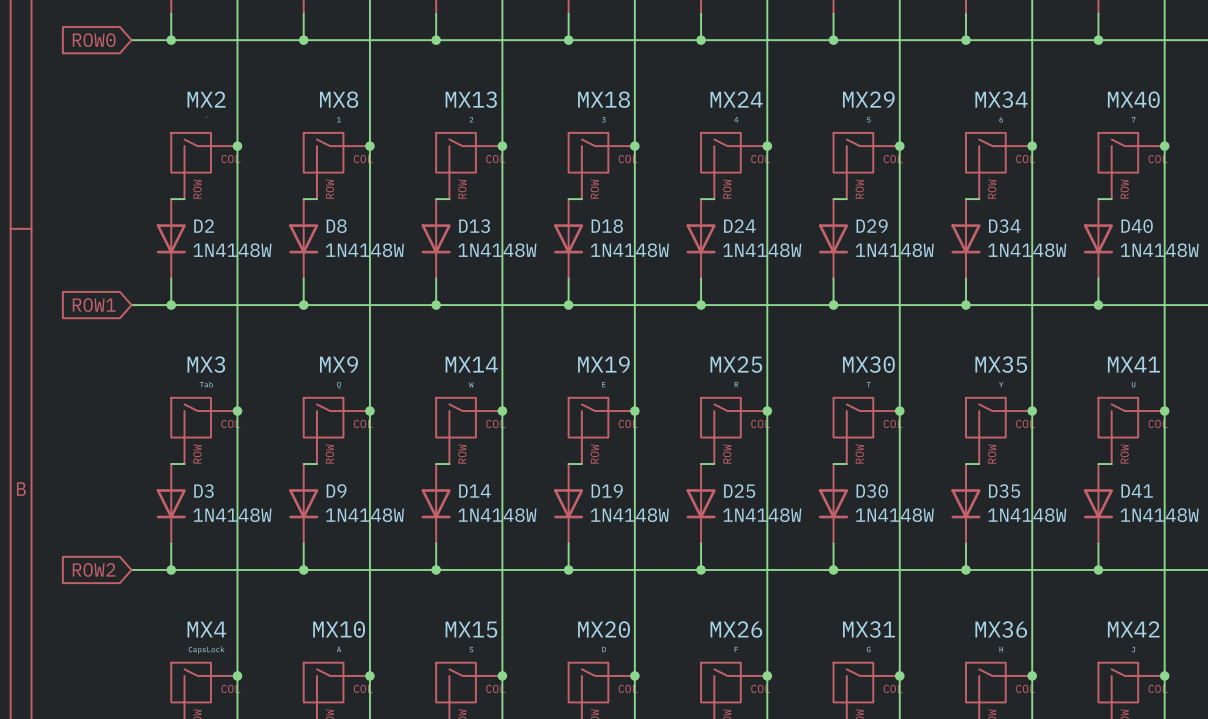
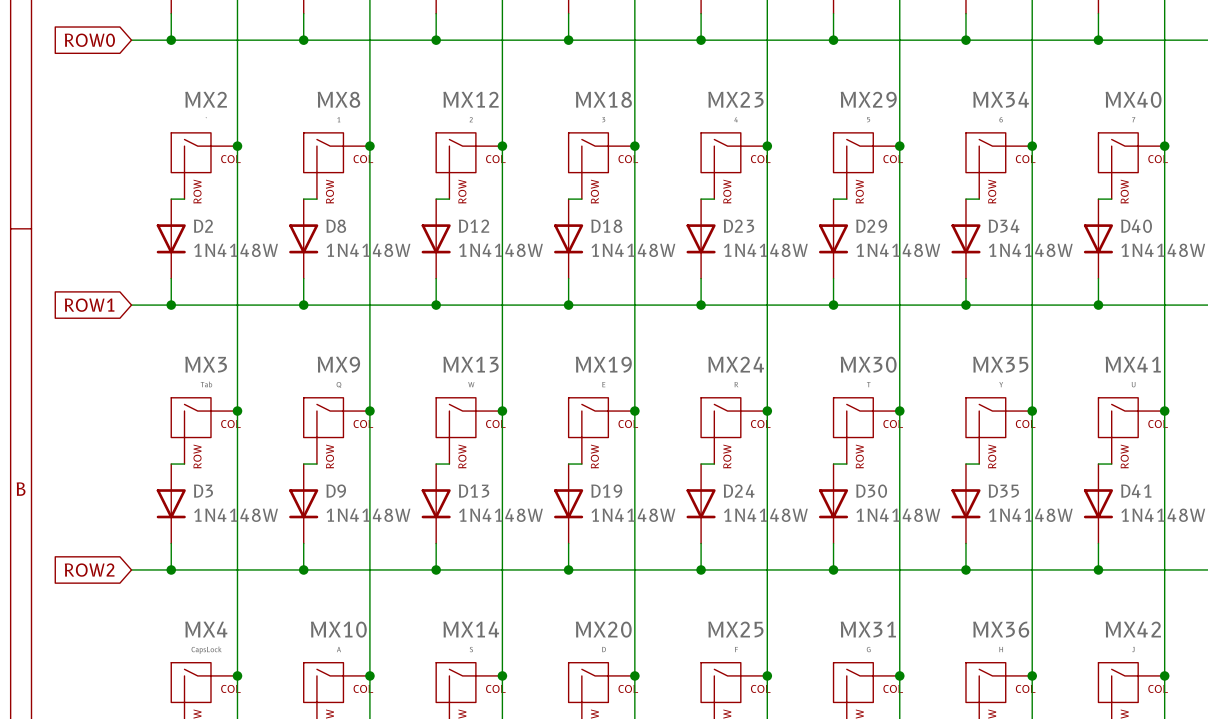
MX13 name: MX13 (471, 99) -> MX12 (471, 99)
MX24 name: MX24 (736, 99) -> MX23 (735, 99)
D13 name: D13 (474, 226) -> D12 (474, 226)
D24 name: D24 (739, 226) -> D23 (738, 226)
MX14 name: MX14 (471, 364) -> MX13 (471, 364)
MX25 name: MX25 (736, 364) -> MX24 (736, 364)
D14 name: D14 (474, 491) -> D13 (474, 491)
D25 name: D25 (739, 491) -> D24 (739, 491)
MX15 name: MX15 (471, 629) -> MX14 (471, 629)
MX26 name: MX26 (736, 629) -> MX25 (735, 629)

